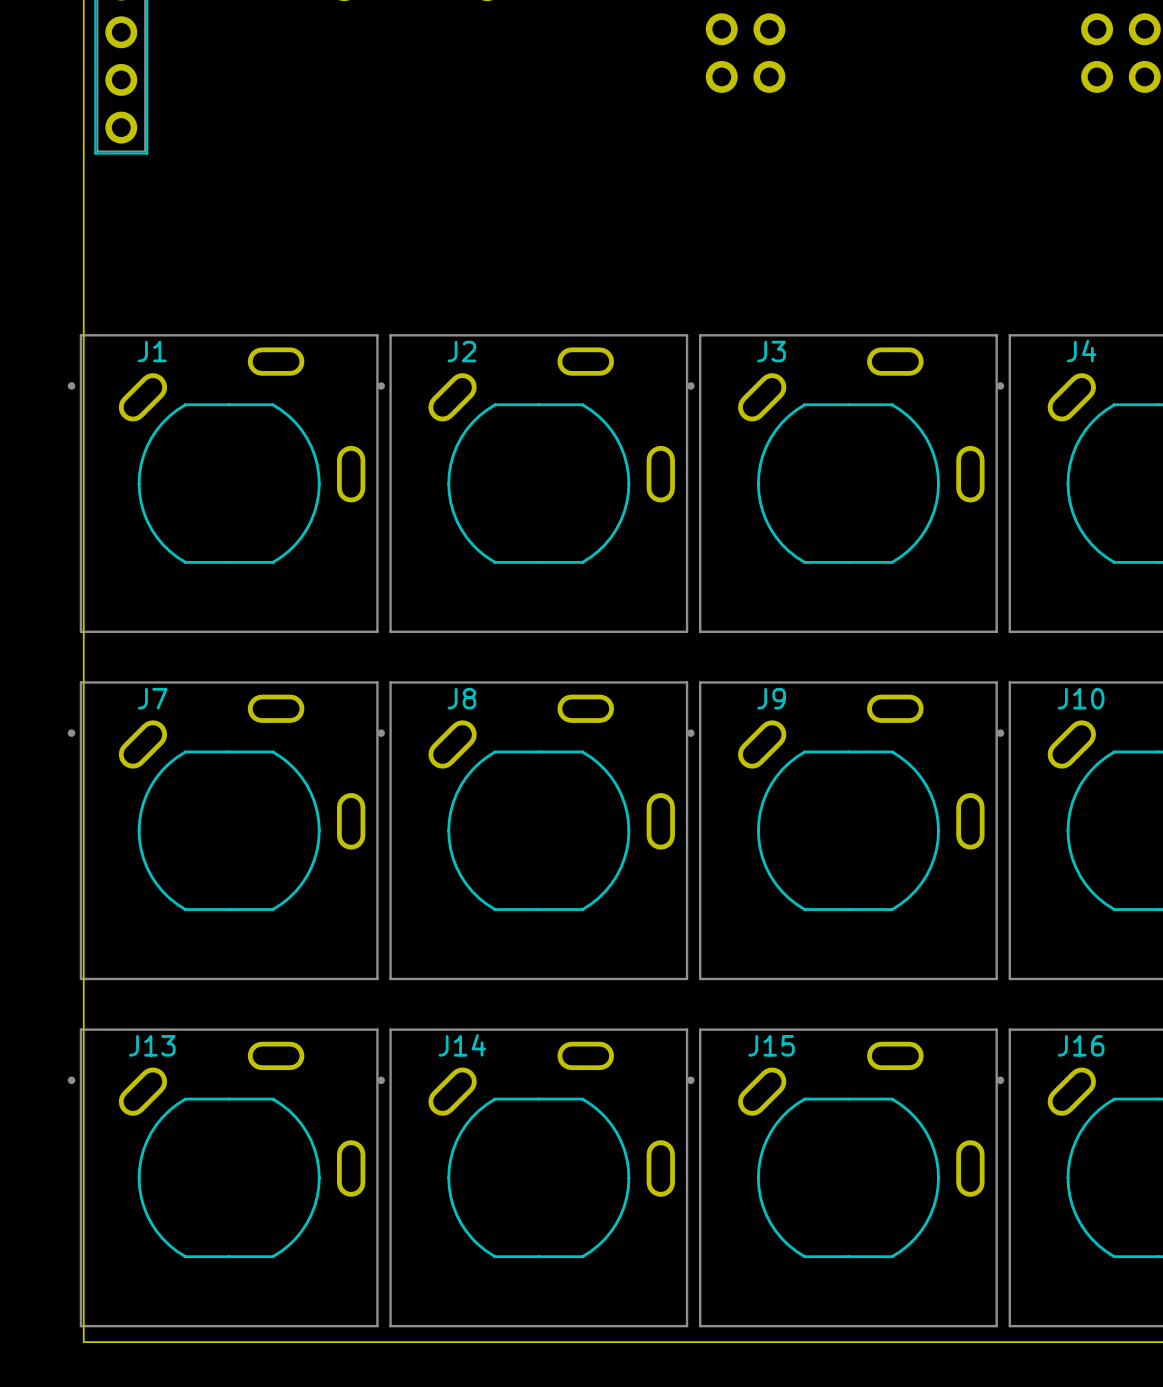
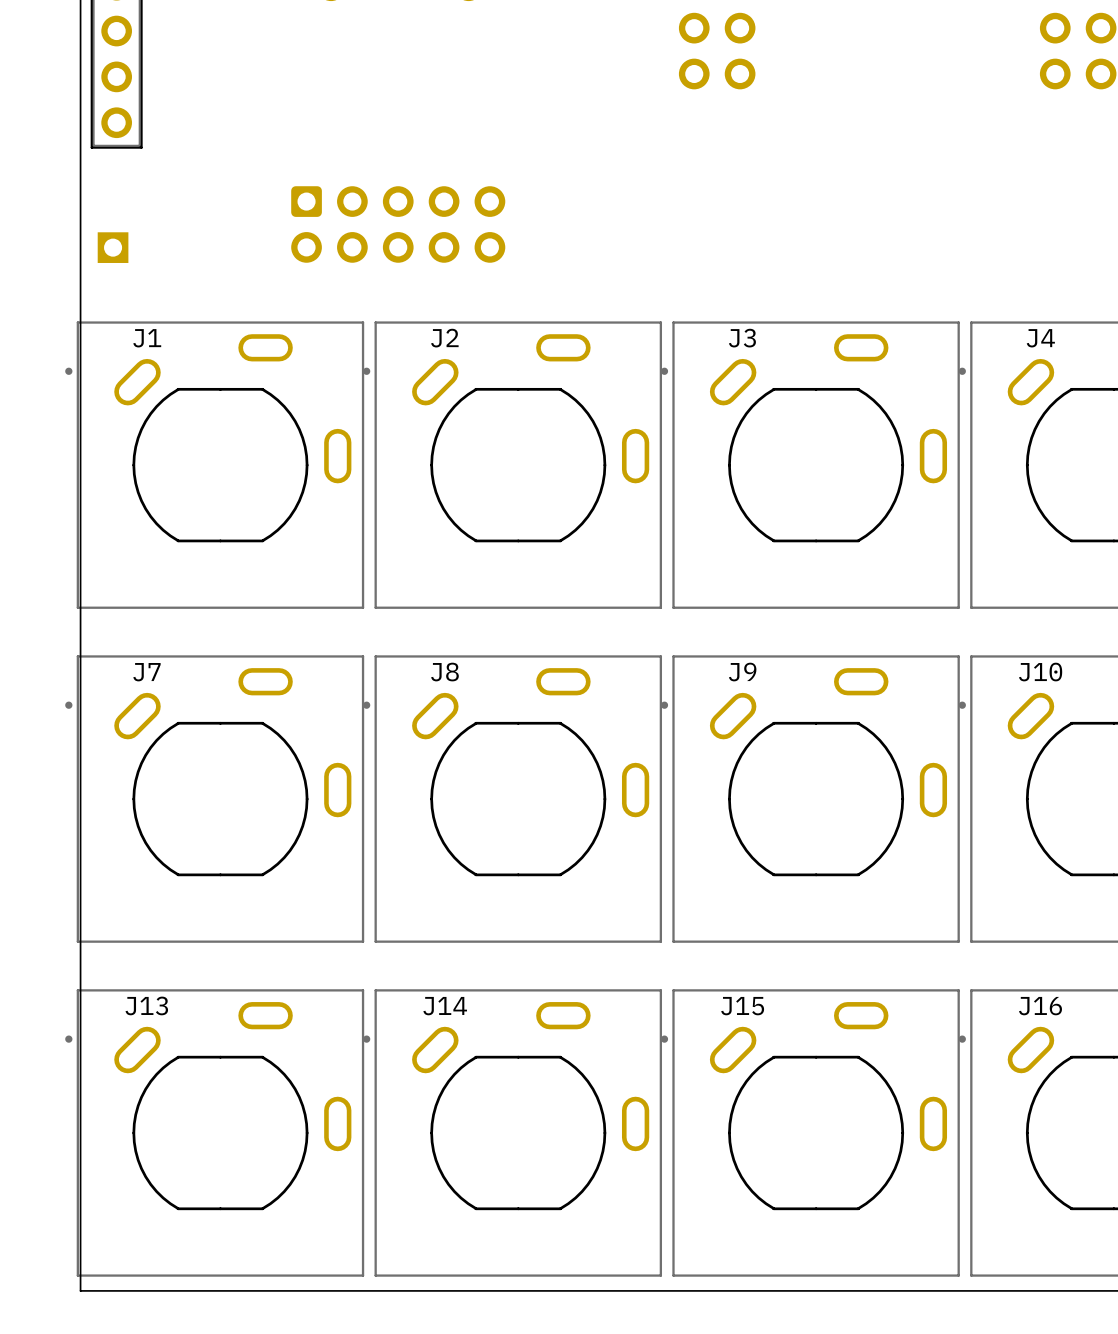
part: none -> (398, 224)
part: none -> (113, 247)

